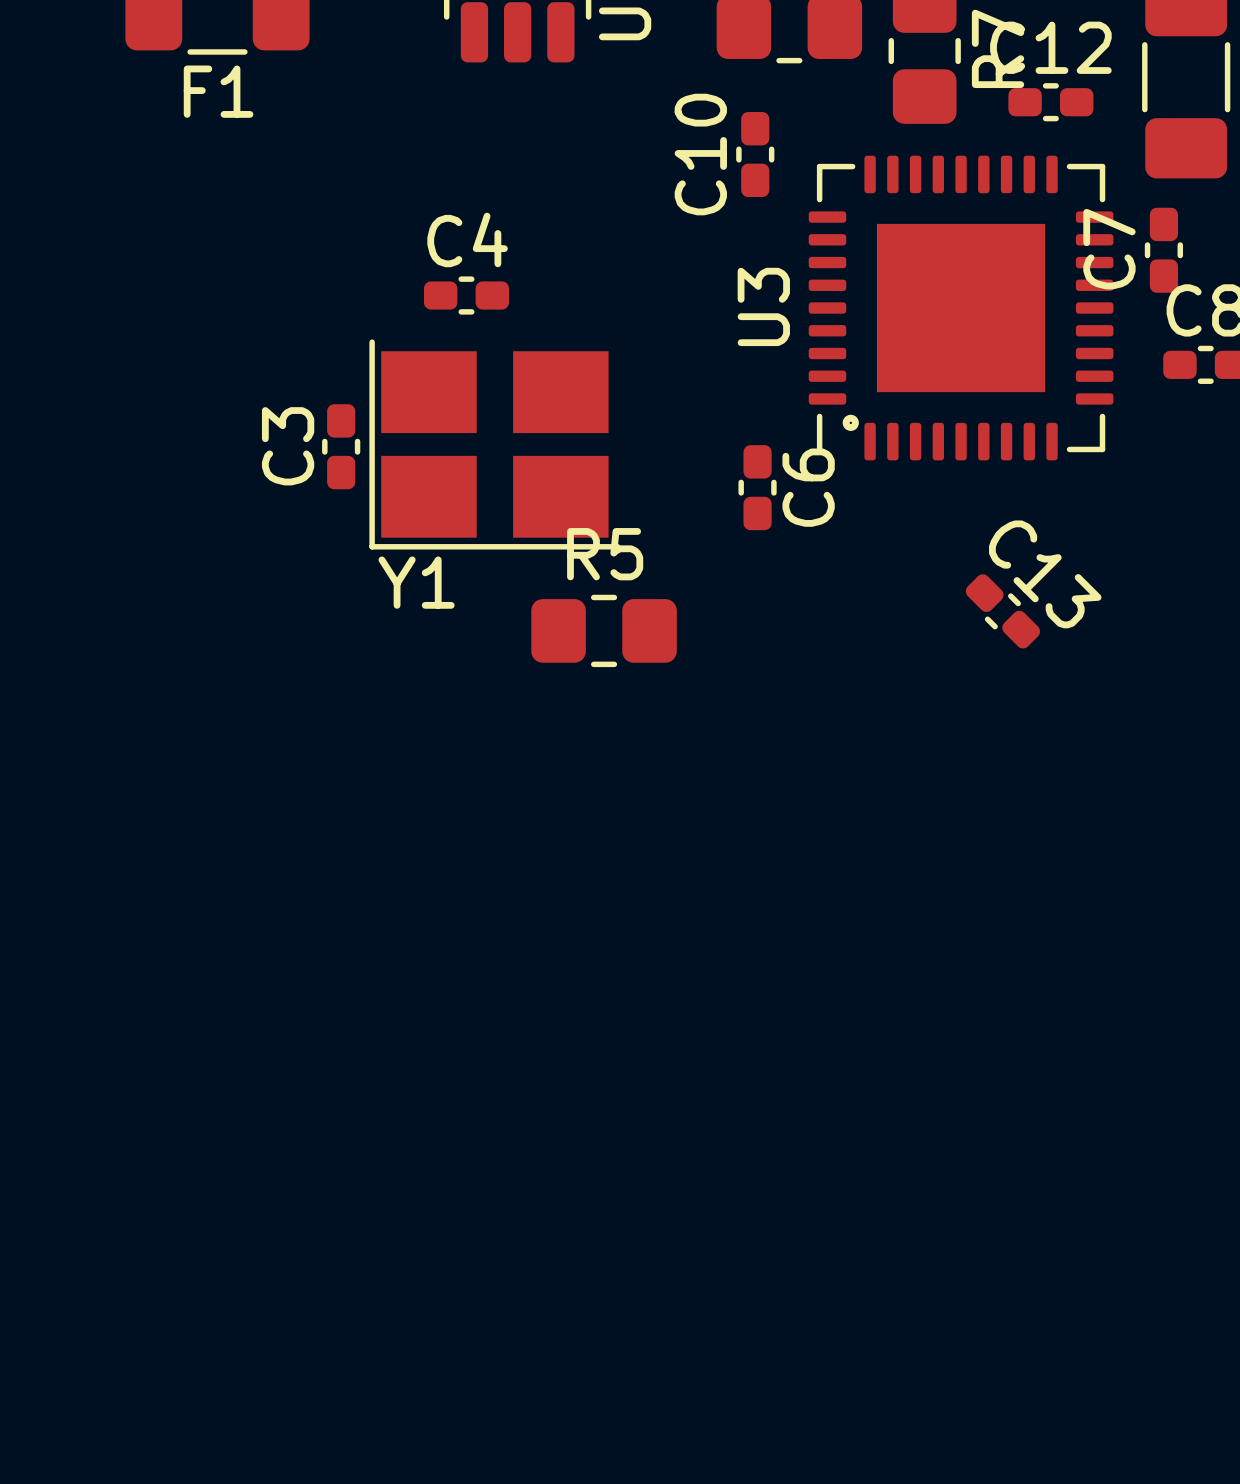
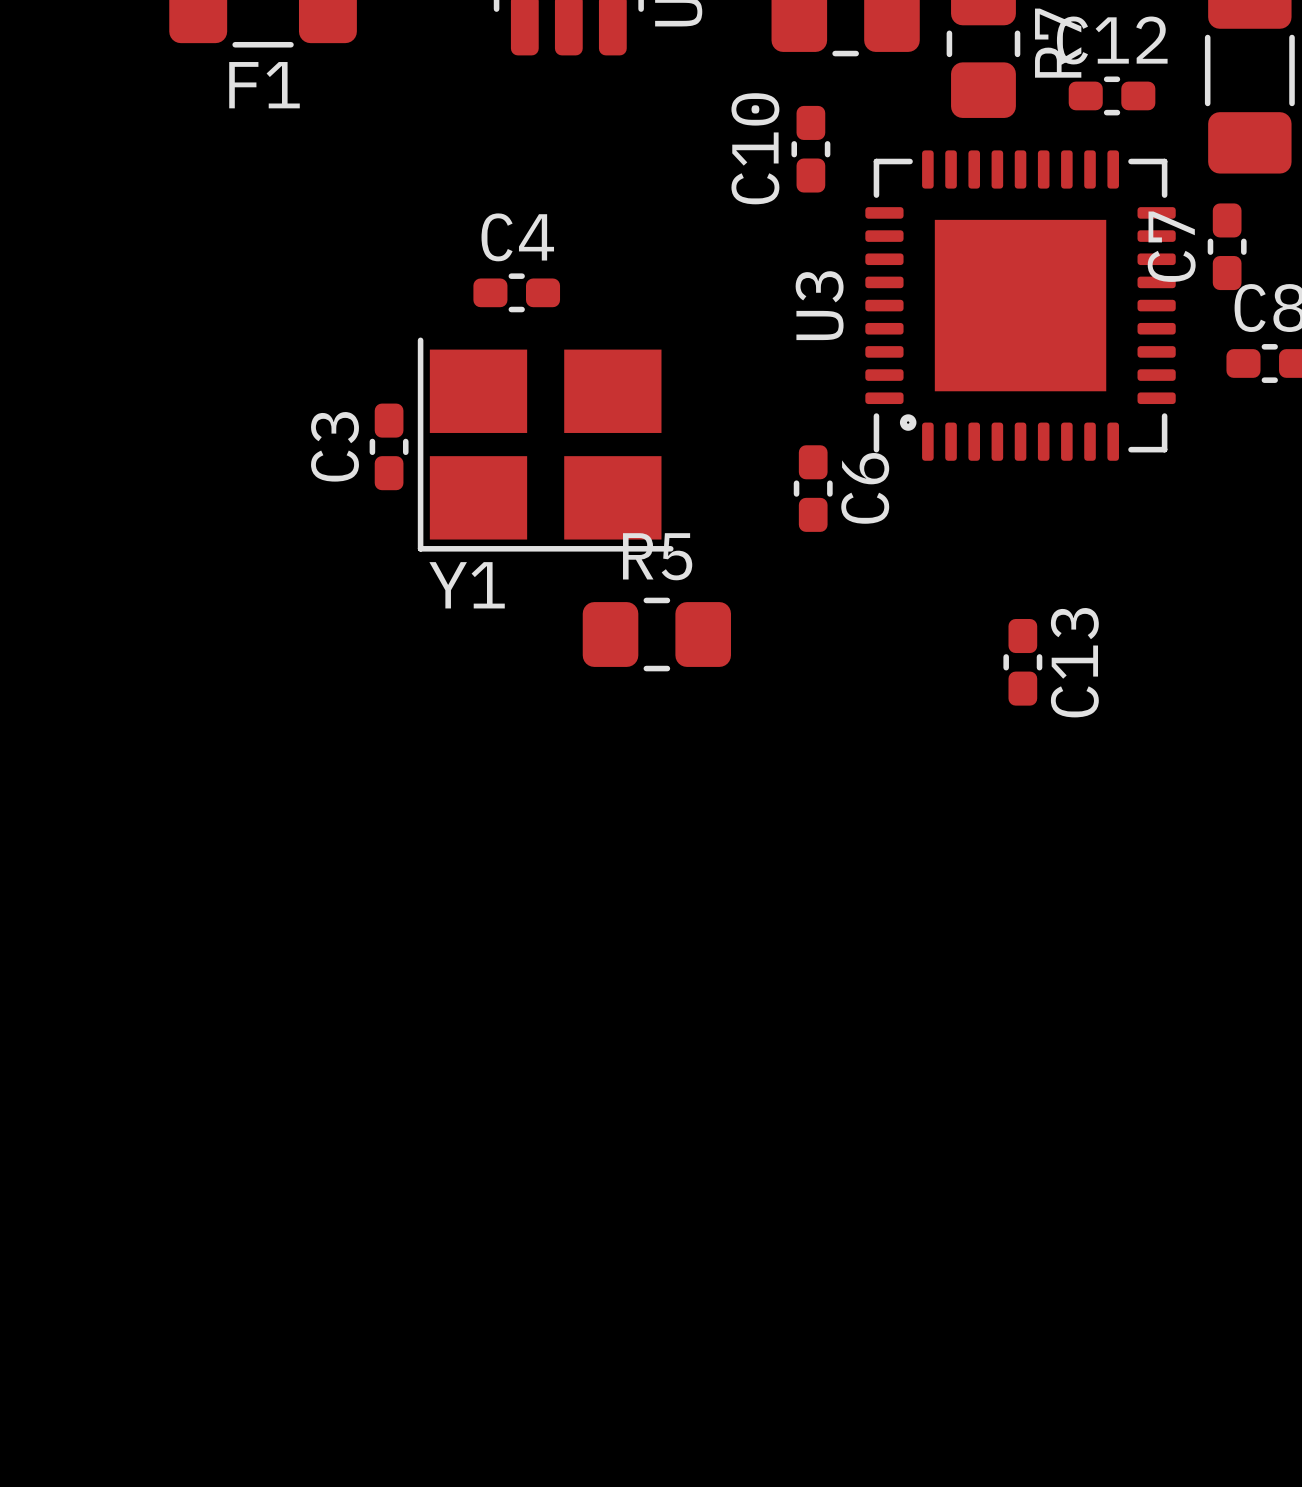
C13 rotation: 0° (1002, 611) -> 45° clockwise (1022, 662)
C13 position: (1002, 611) -> (1022, 662)

